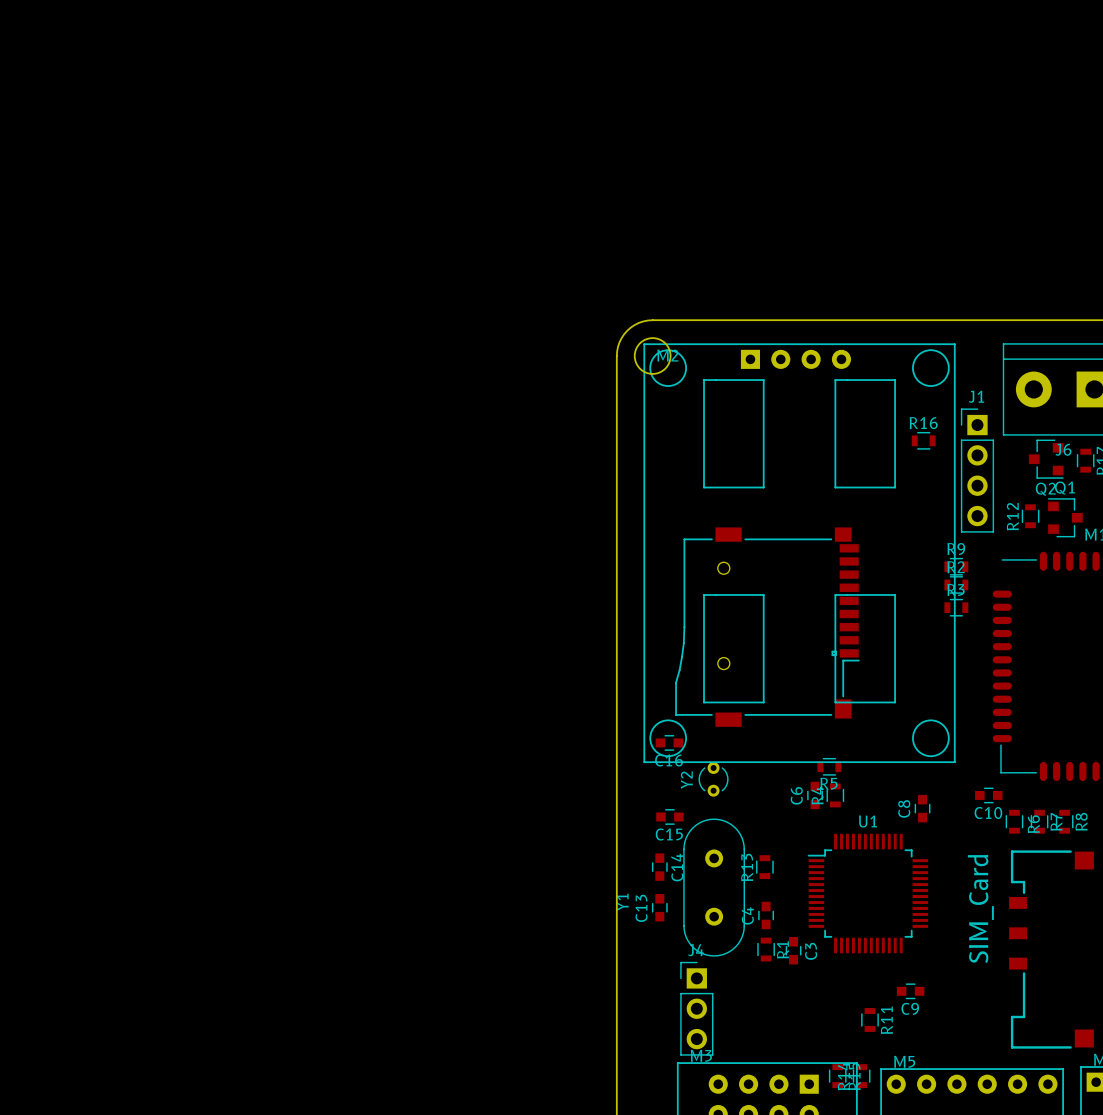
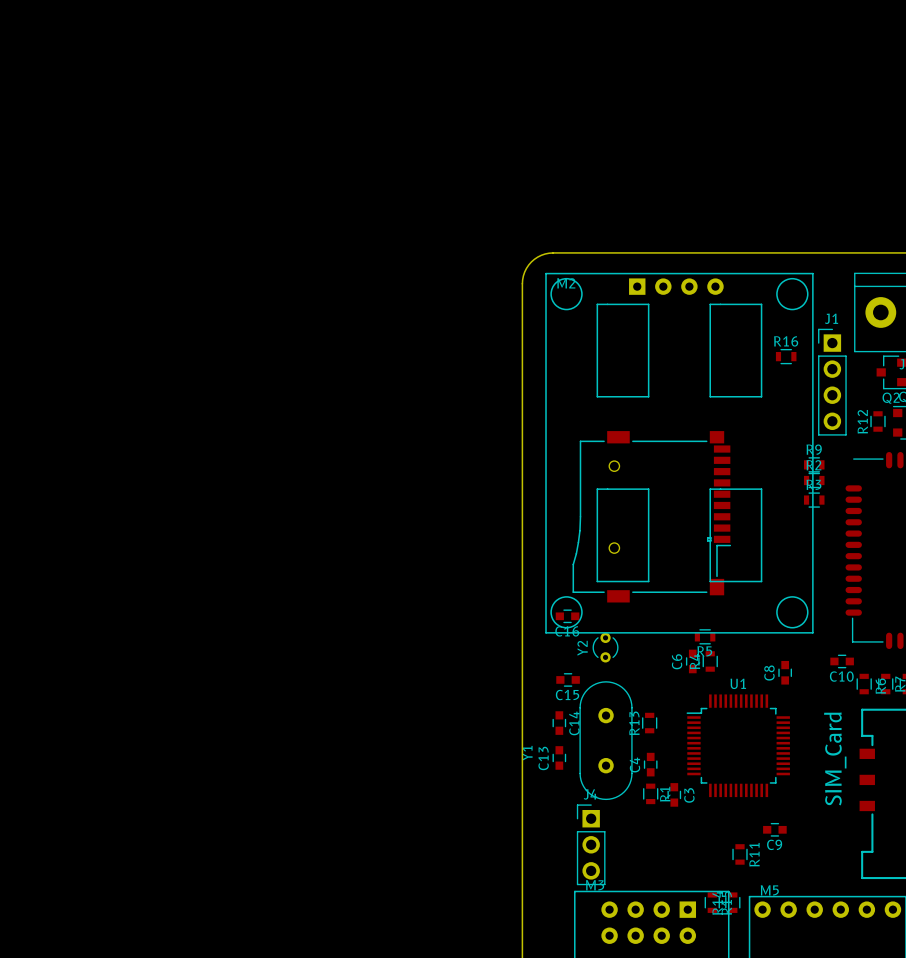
round board edge: [633, 337, 672, 375] -> none

